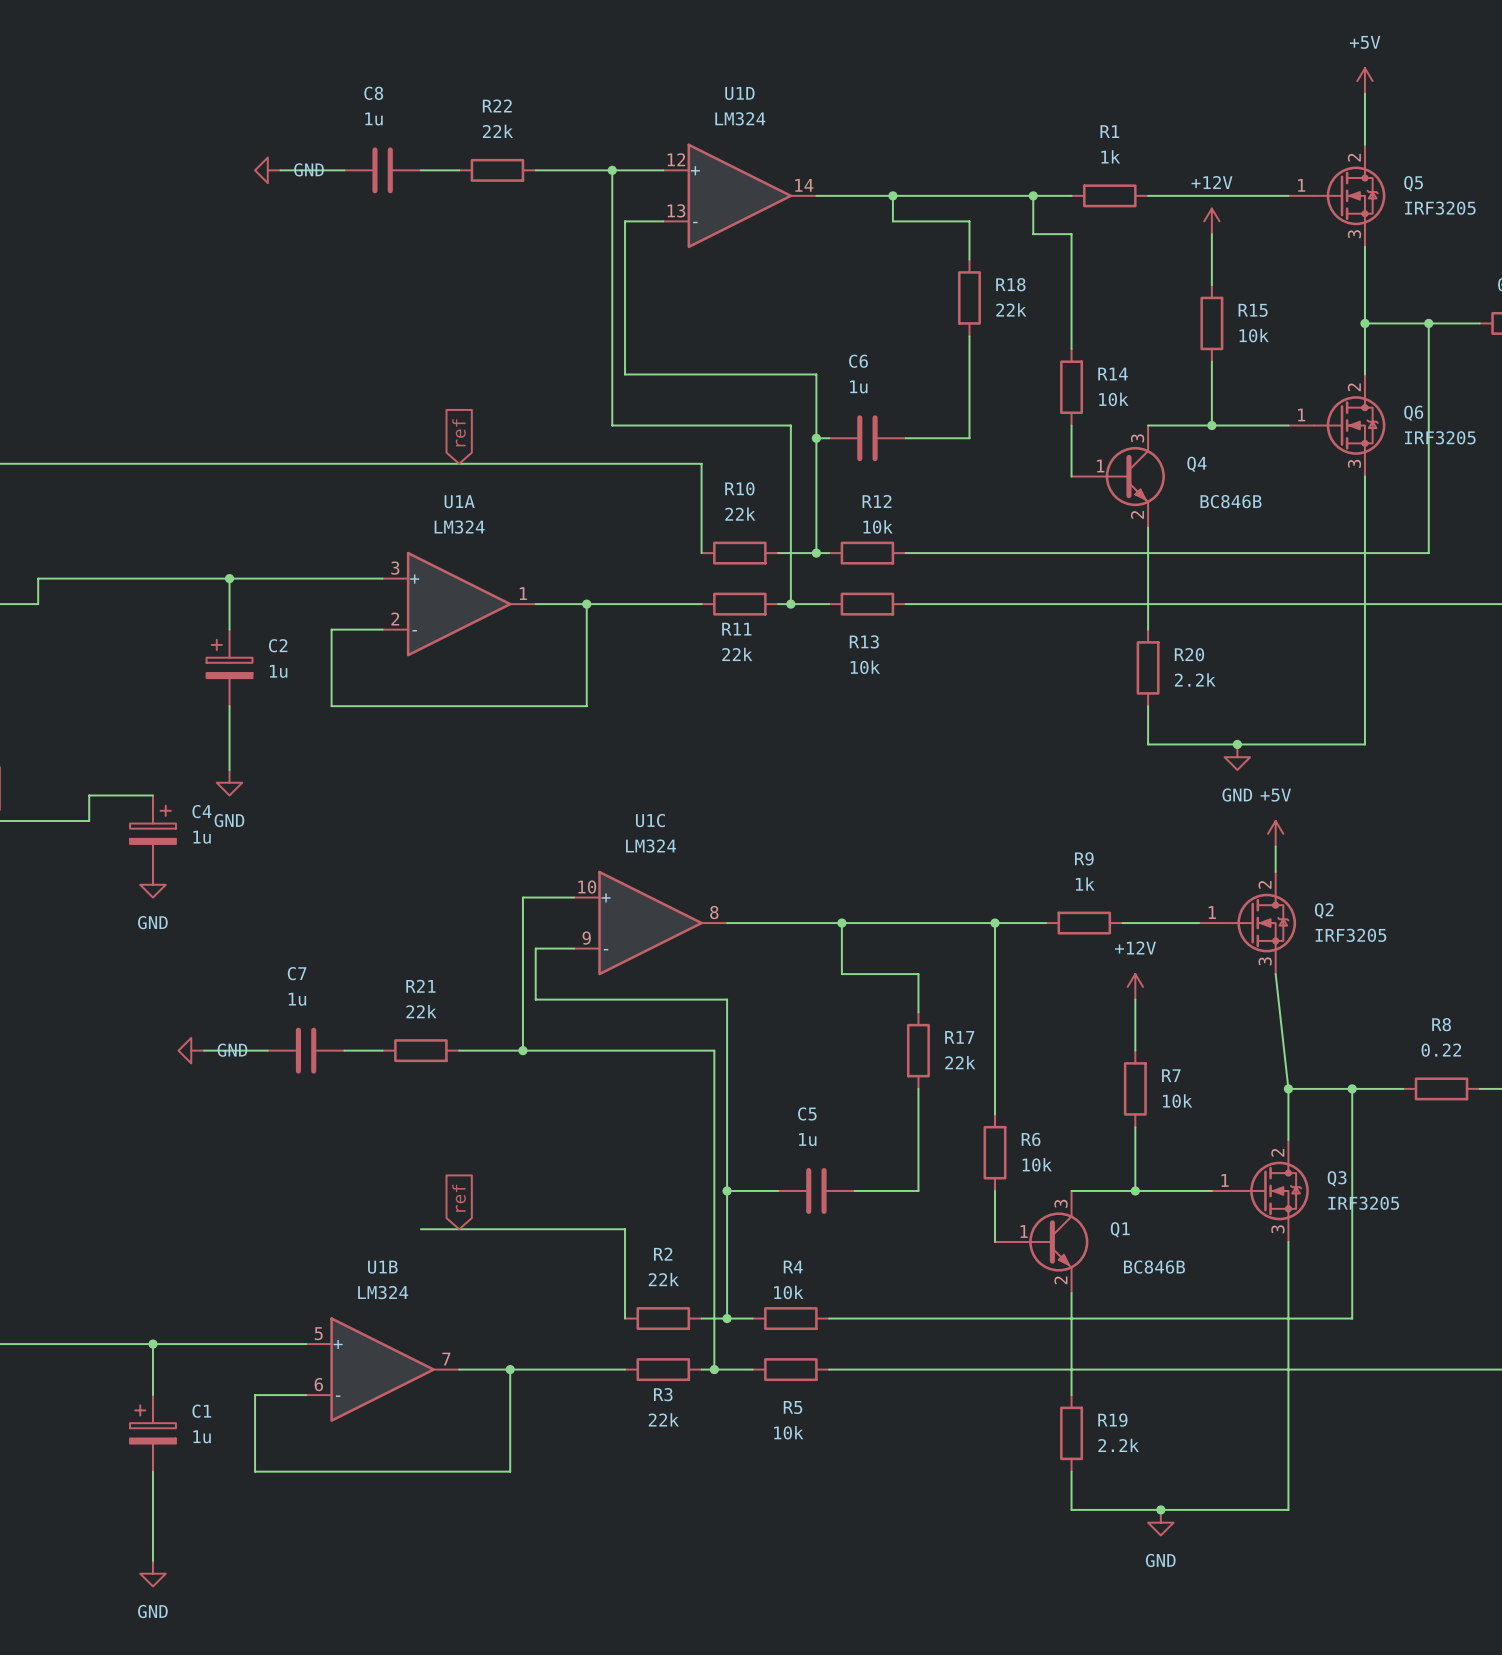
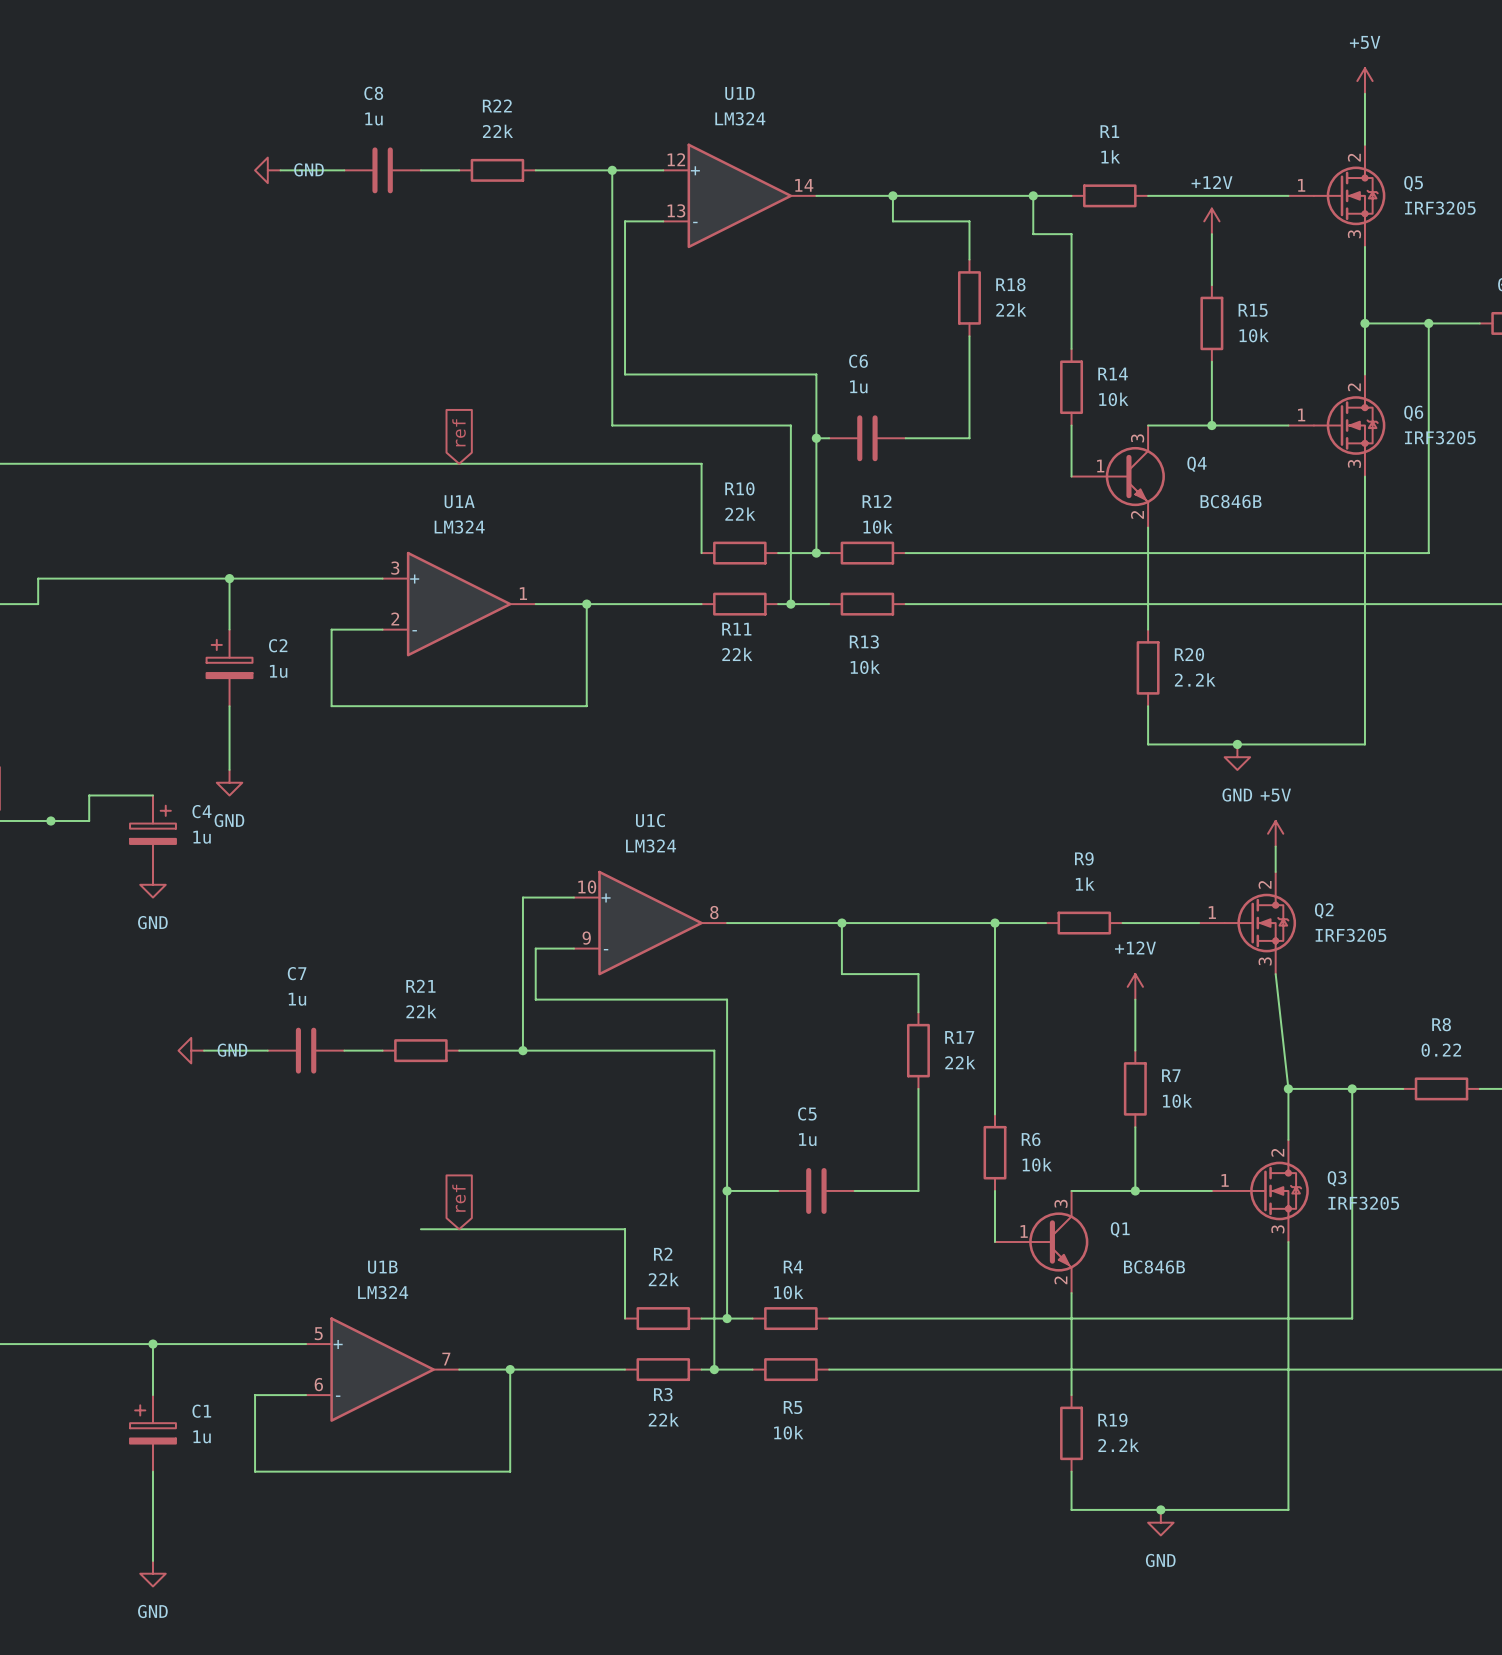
junction: none -> (50, 821)

